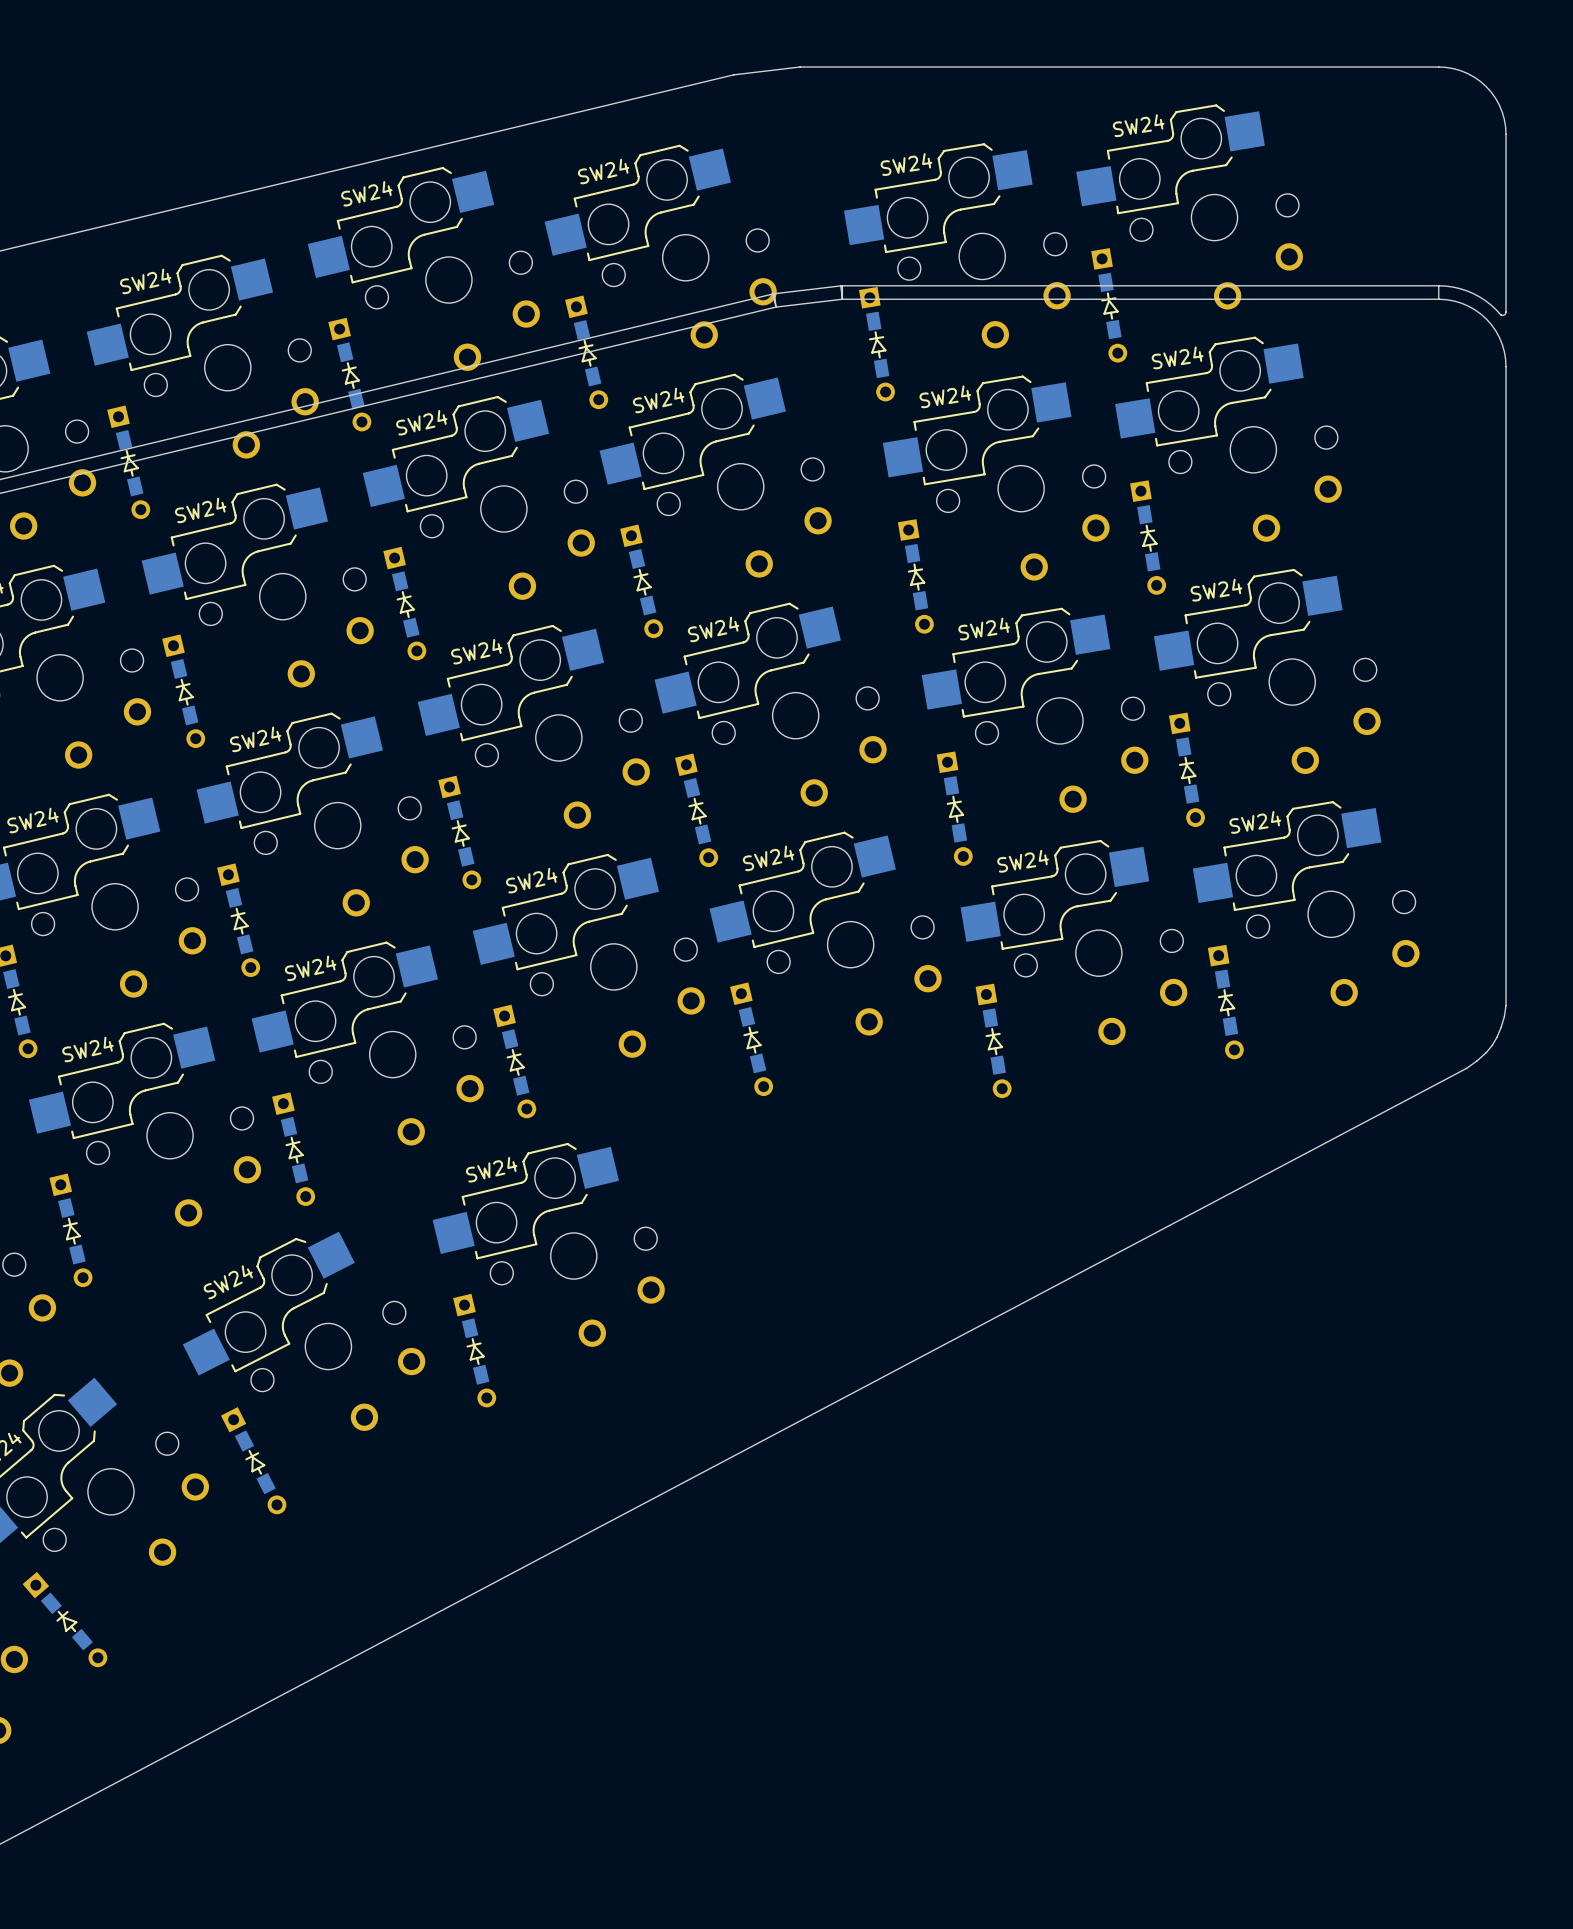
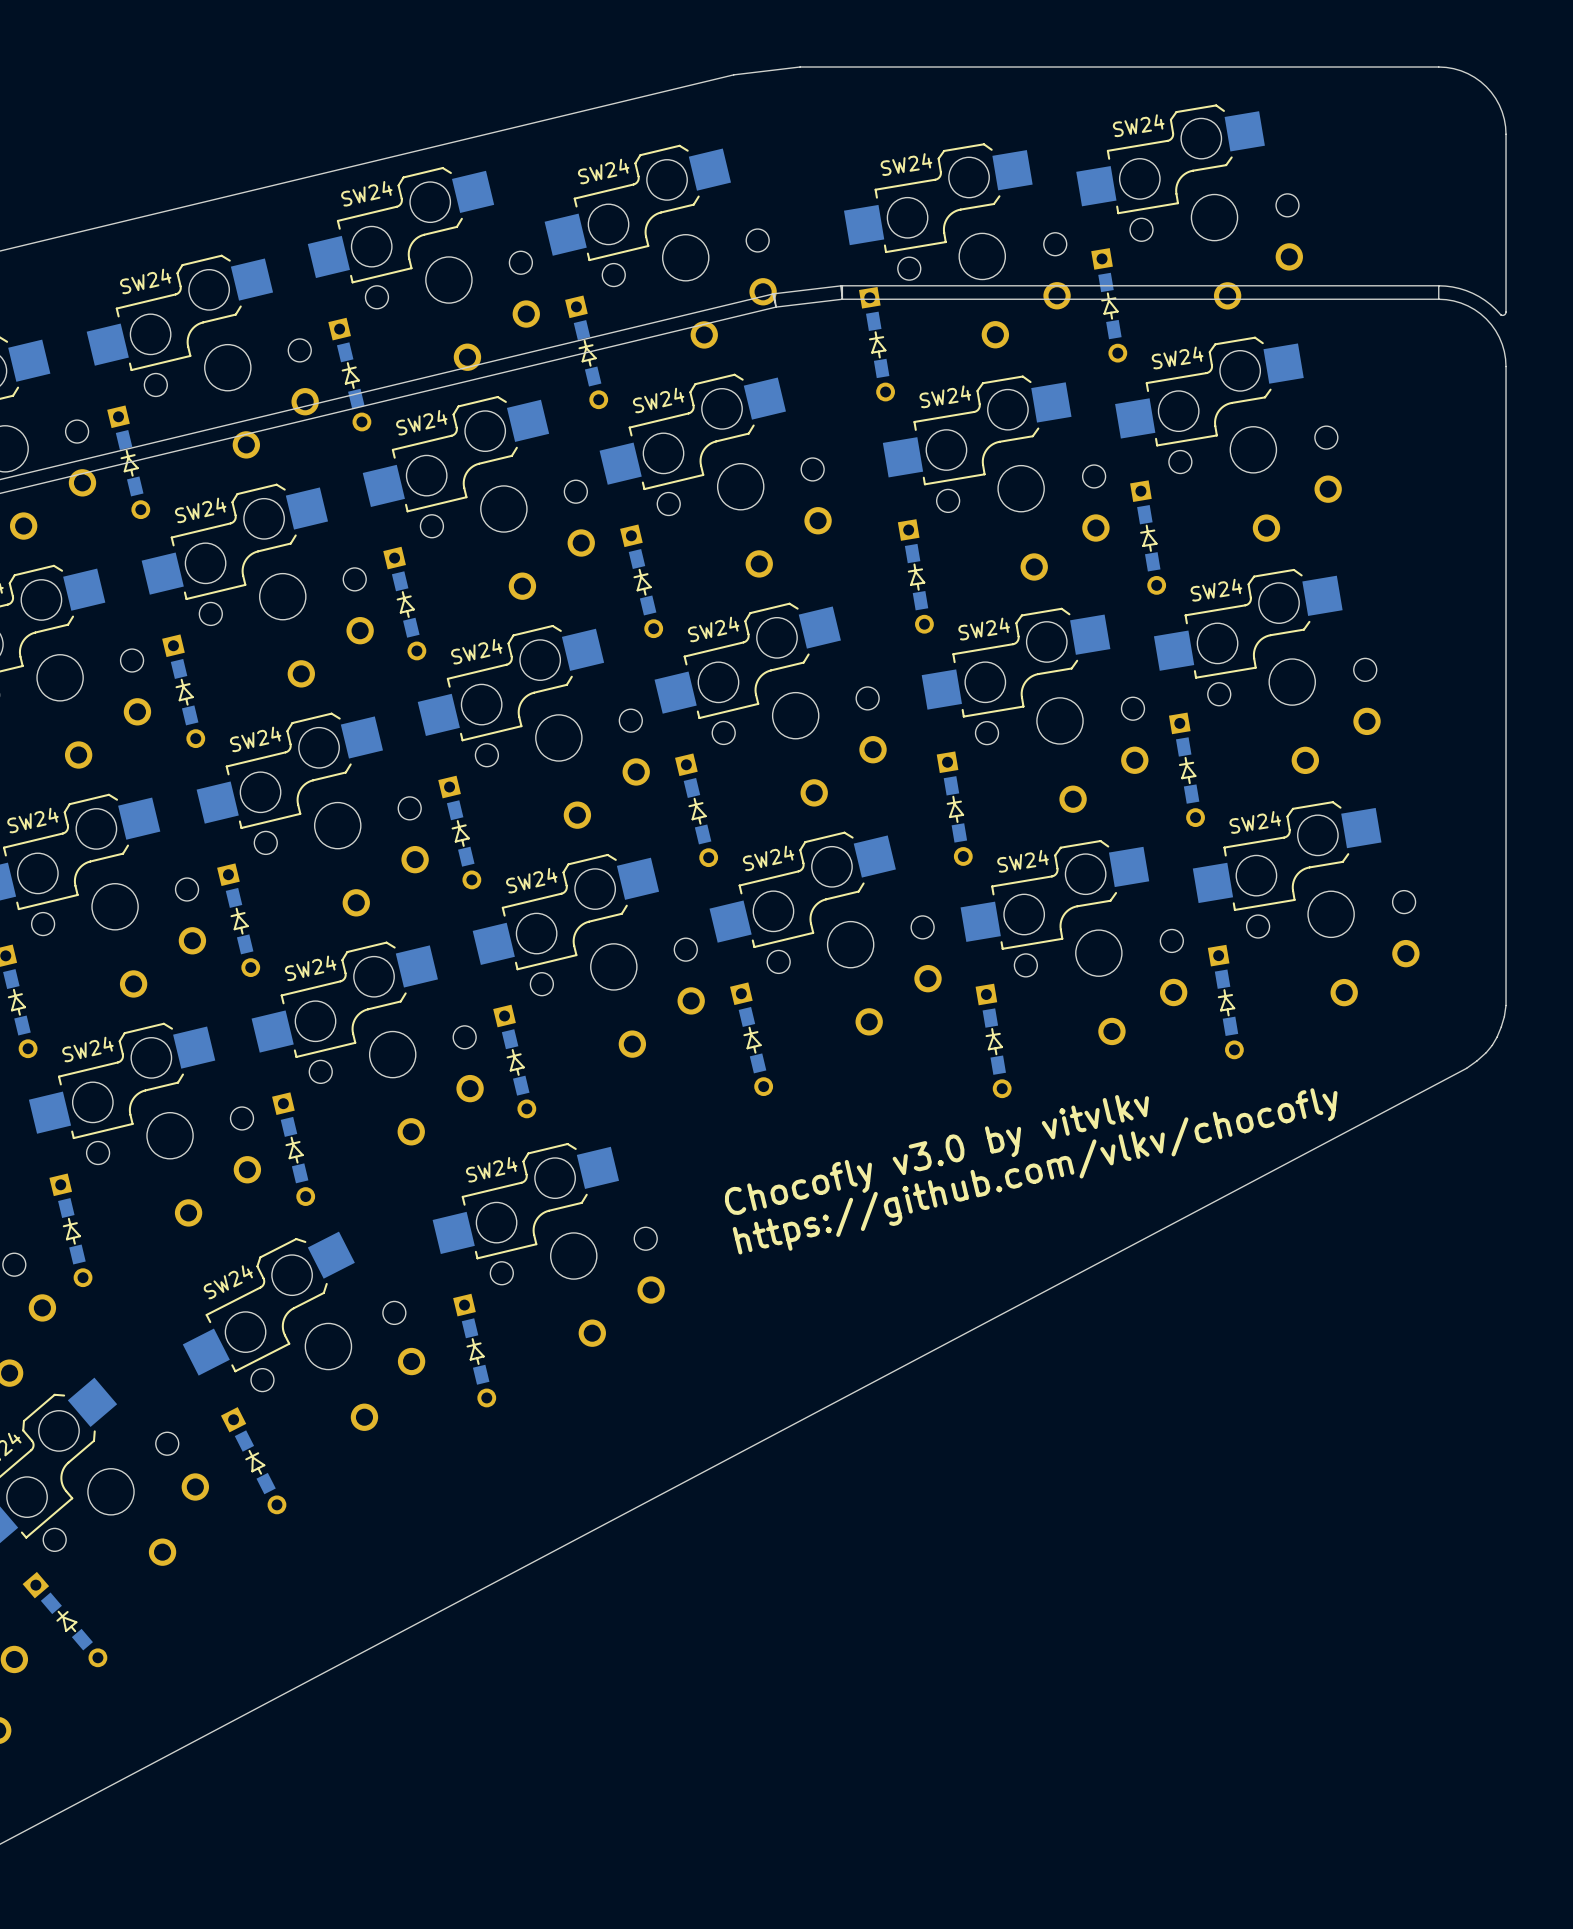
text: none -> Chocofly v3.0 by vitvlkv (936, 1154)
text: none -> https://github.com/vlkv/chocofly (1035, 1171)

